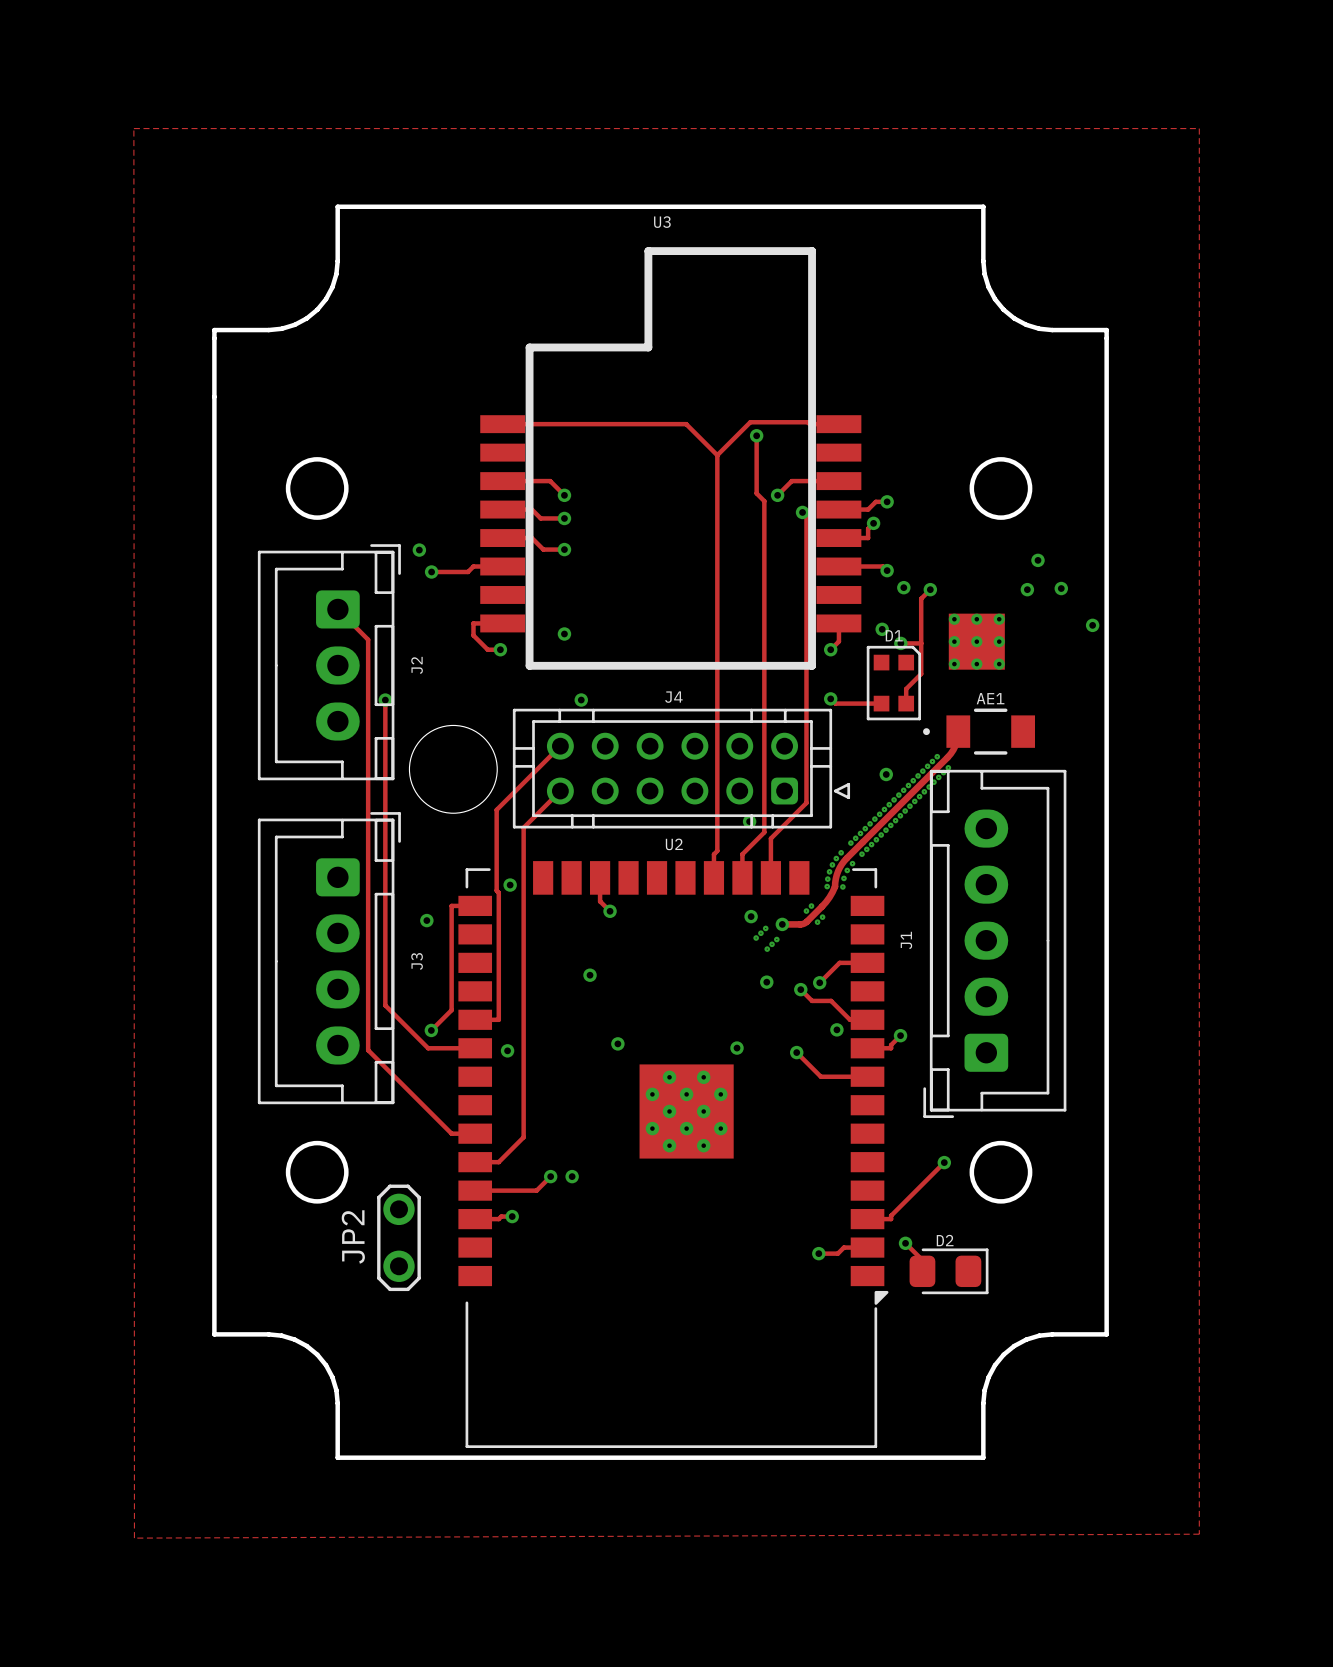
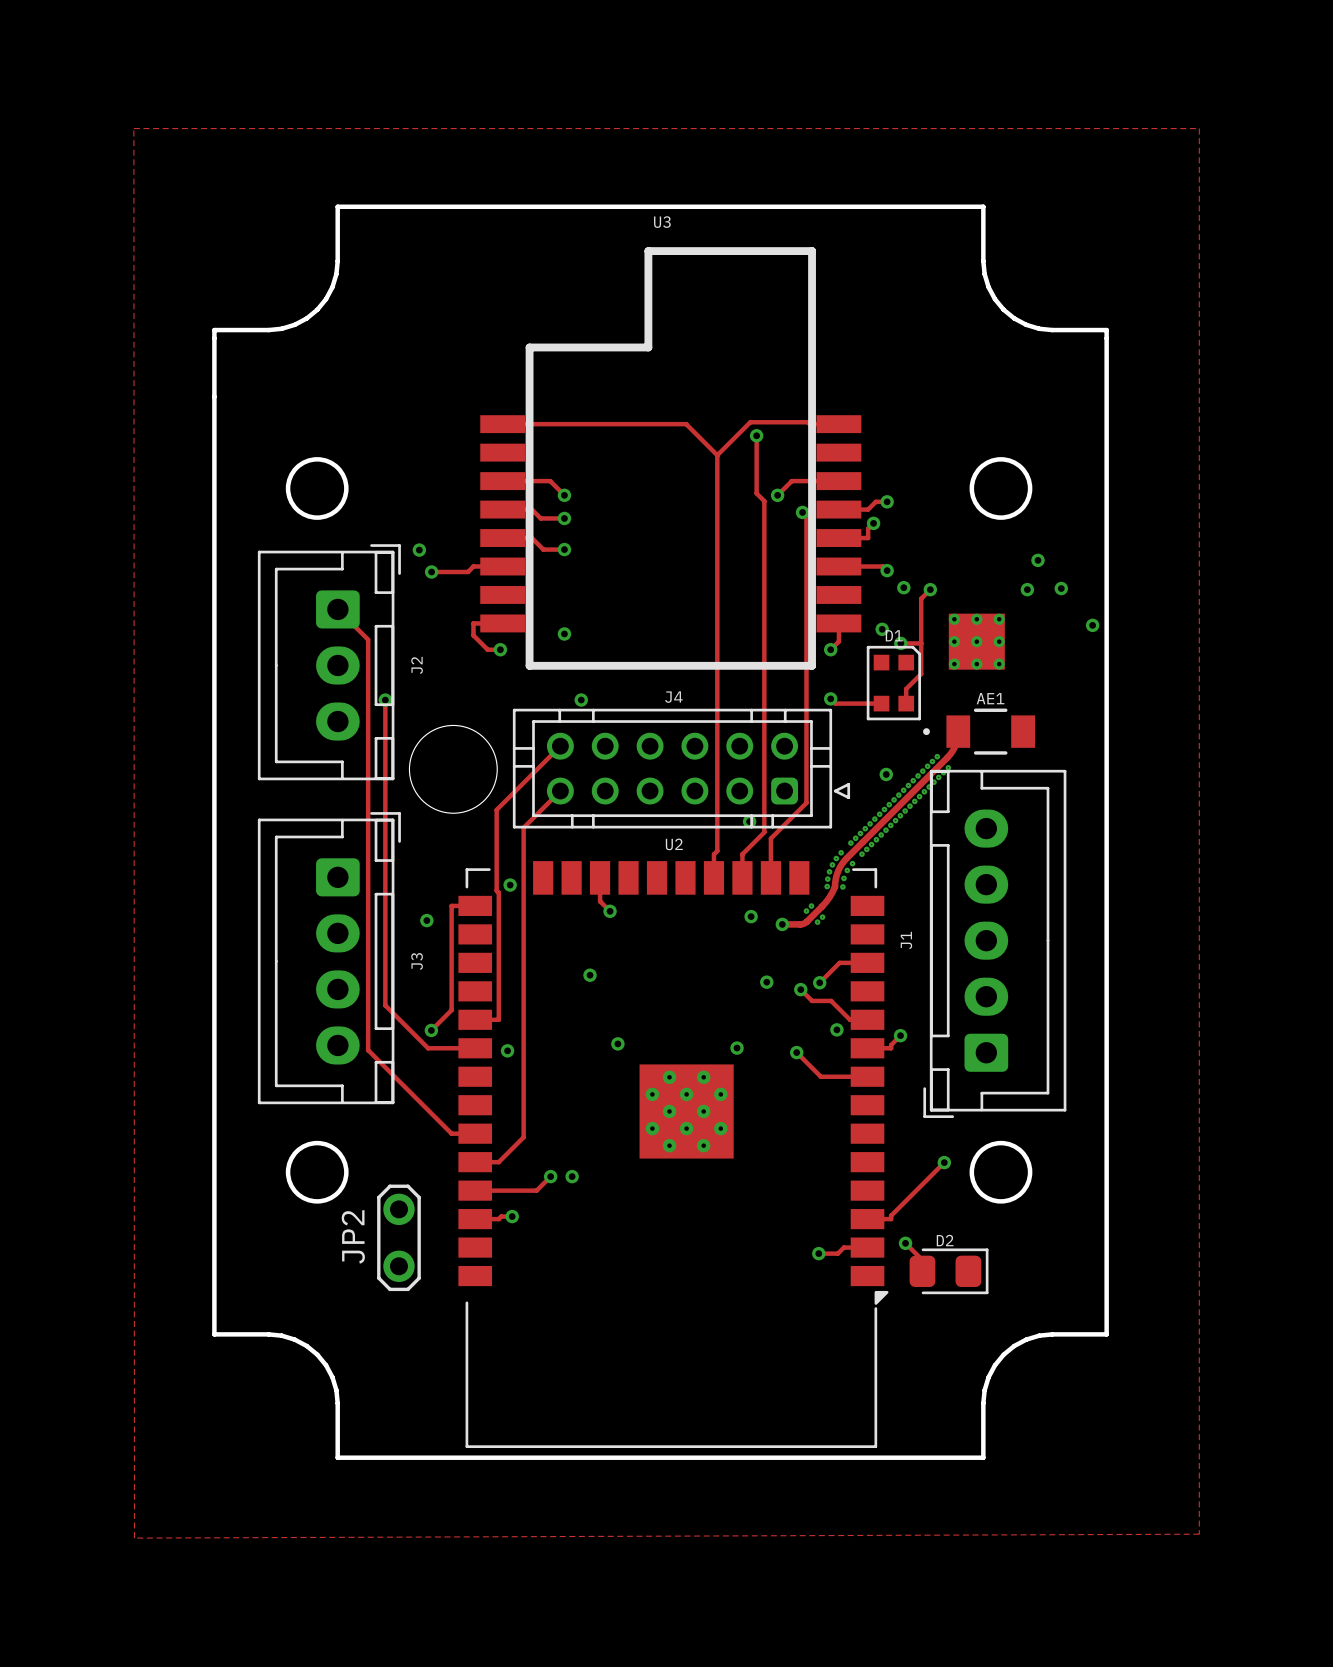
via: (765, 928) -> none
via: (760, 933) -> none
via: (756, 938) -> none
via: (776, 939) -> none
via: (772, 944) -> none
via: (767, 949) -> none

